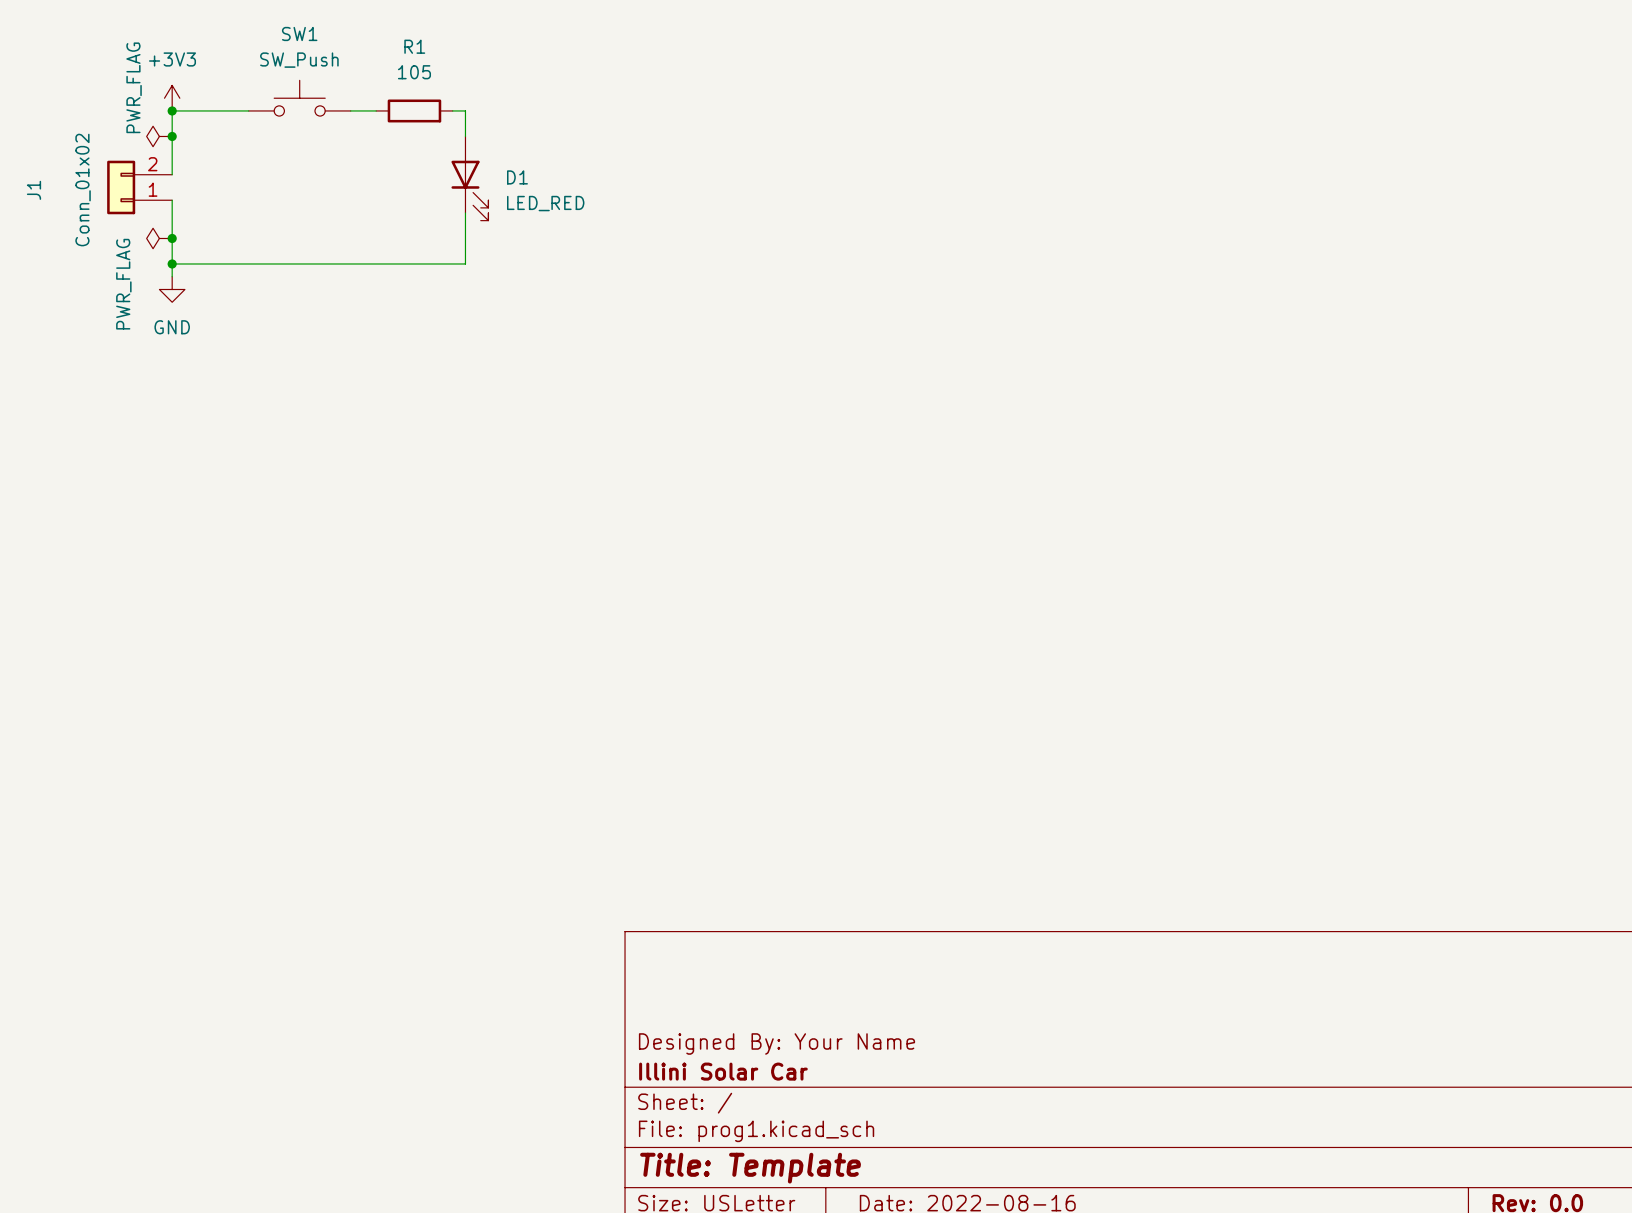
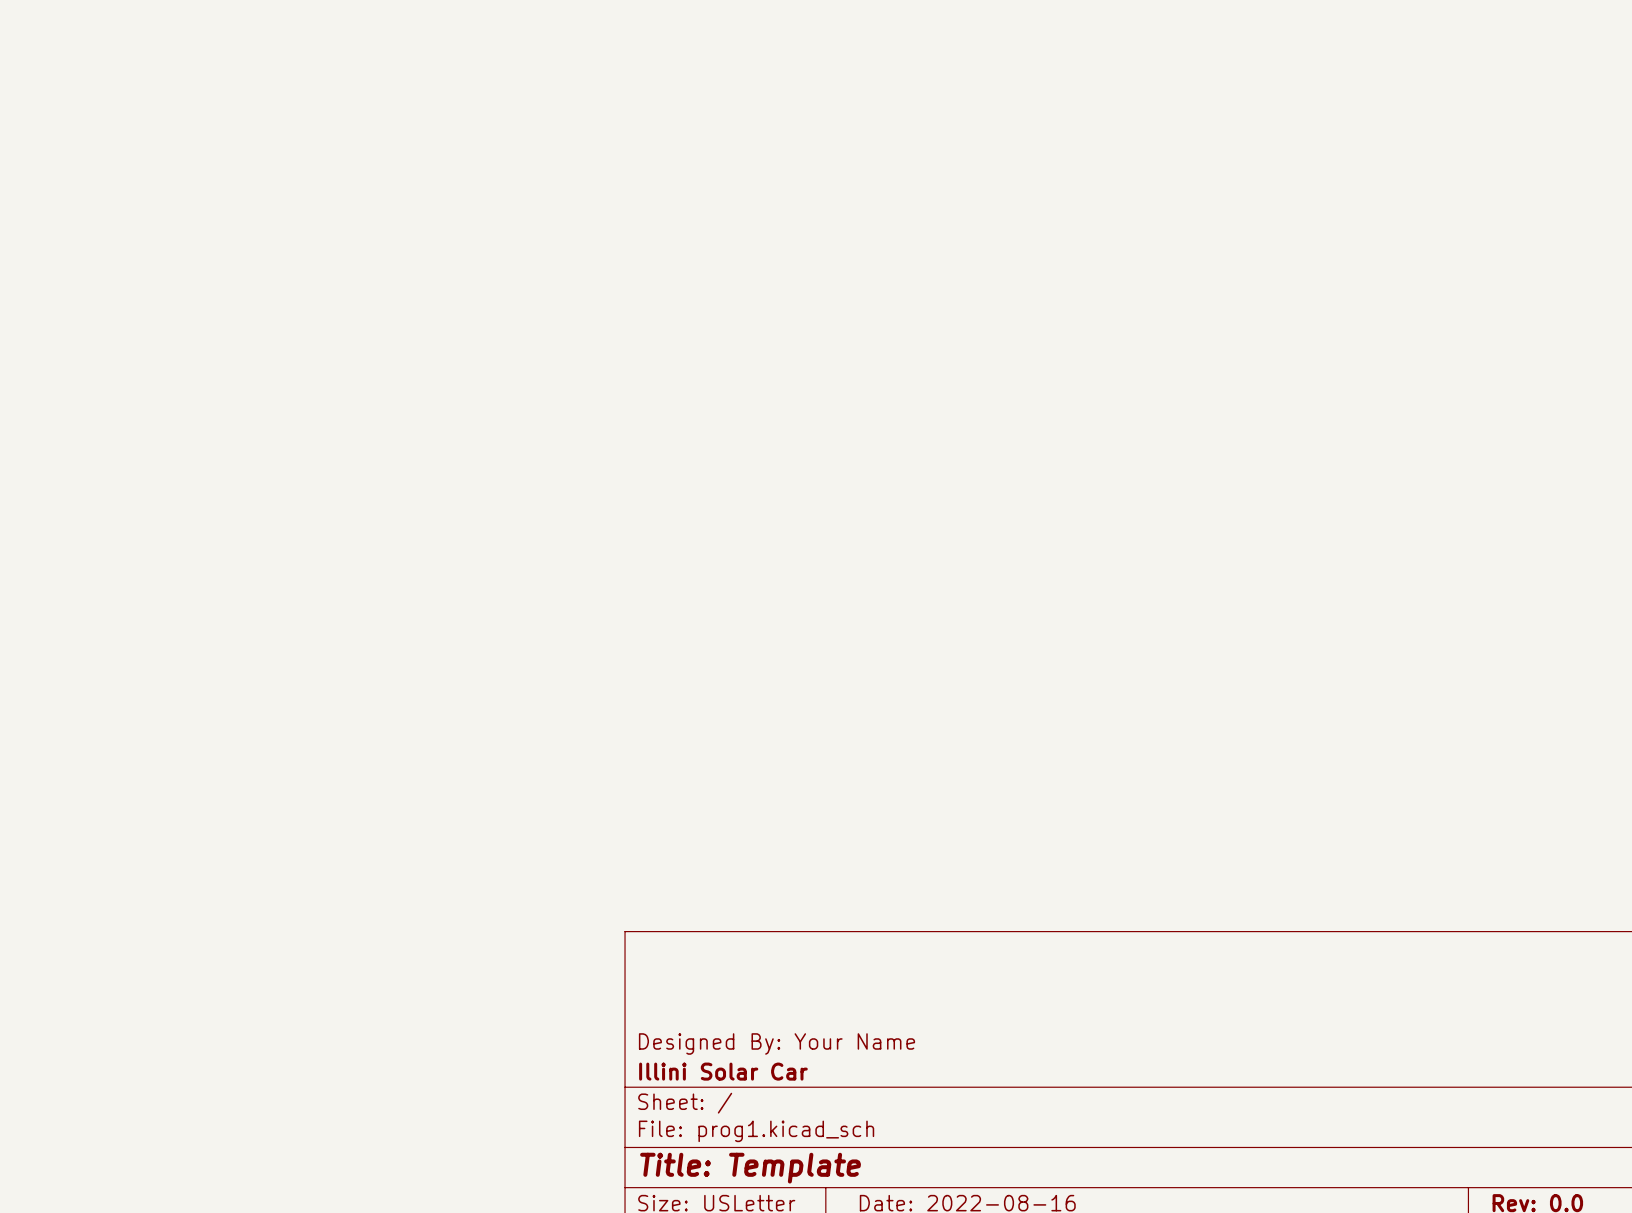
power symbol: +3V3 (172, 98) -> none
SW1: SW_Push (299, 98) -> none
junction: (172, 110) -> none
wire: (248, 110) (172, 110) (172, 174) -> none
wire: (350, 110) (376, 110) -> none
R1: 105 (414, 110) -> none
wire: (452, 110) (465, 110) (465, 136) -> none
power symbol: PWR_FLAG (159, 136) -> none
junction: (172, 136) -> none
D1: LED_RED (469, 178) -> none
J1: Conn_01x02 (139, 187) -> none
wire: (172, 200) (172, 276) -> none
wire: (465, 212) (465, 263) (172, 263) -> none
power symbol: PWR_FLAG (159, 238) -> none
junction: (172, 238) -> none
junction: (172, 263) -> none
power symbol: GND (172, 289) -> none

